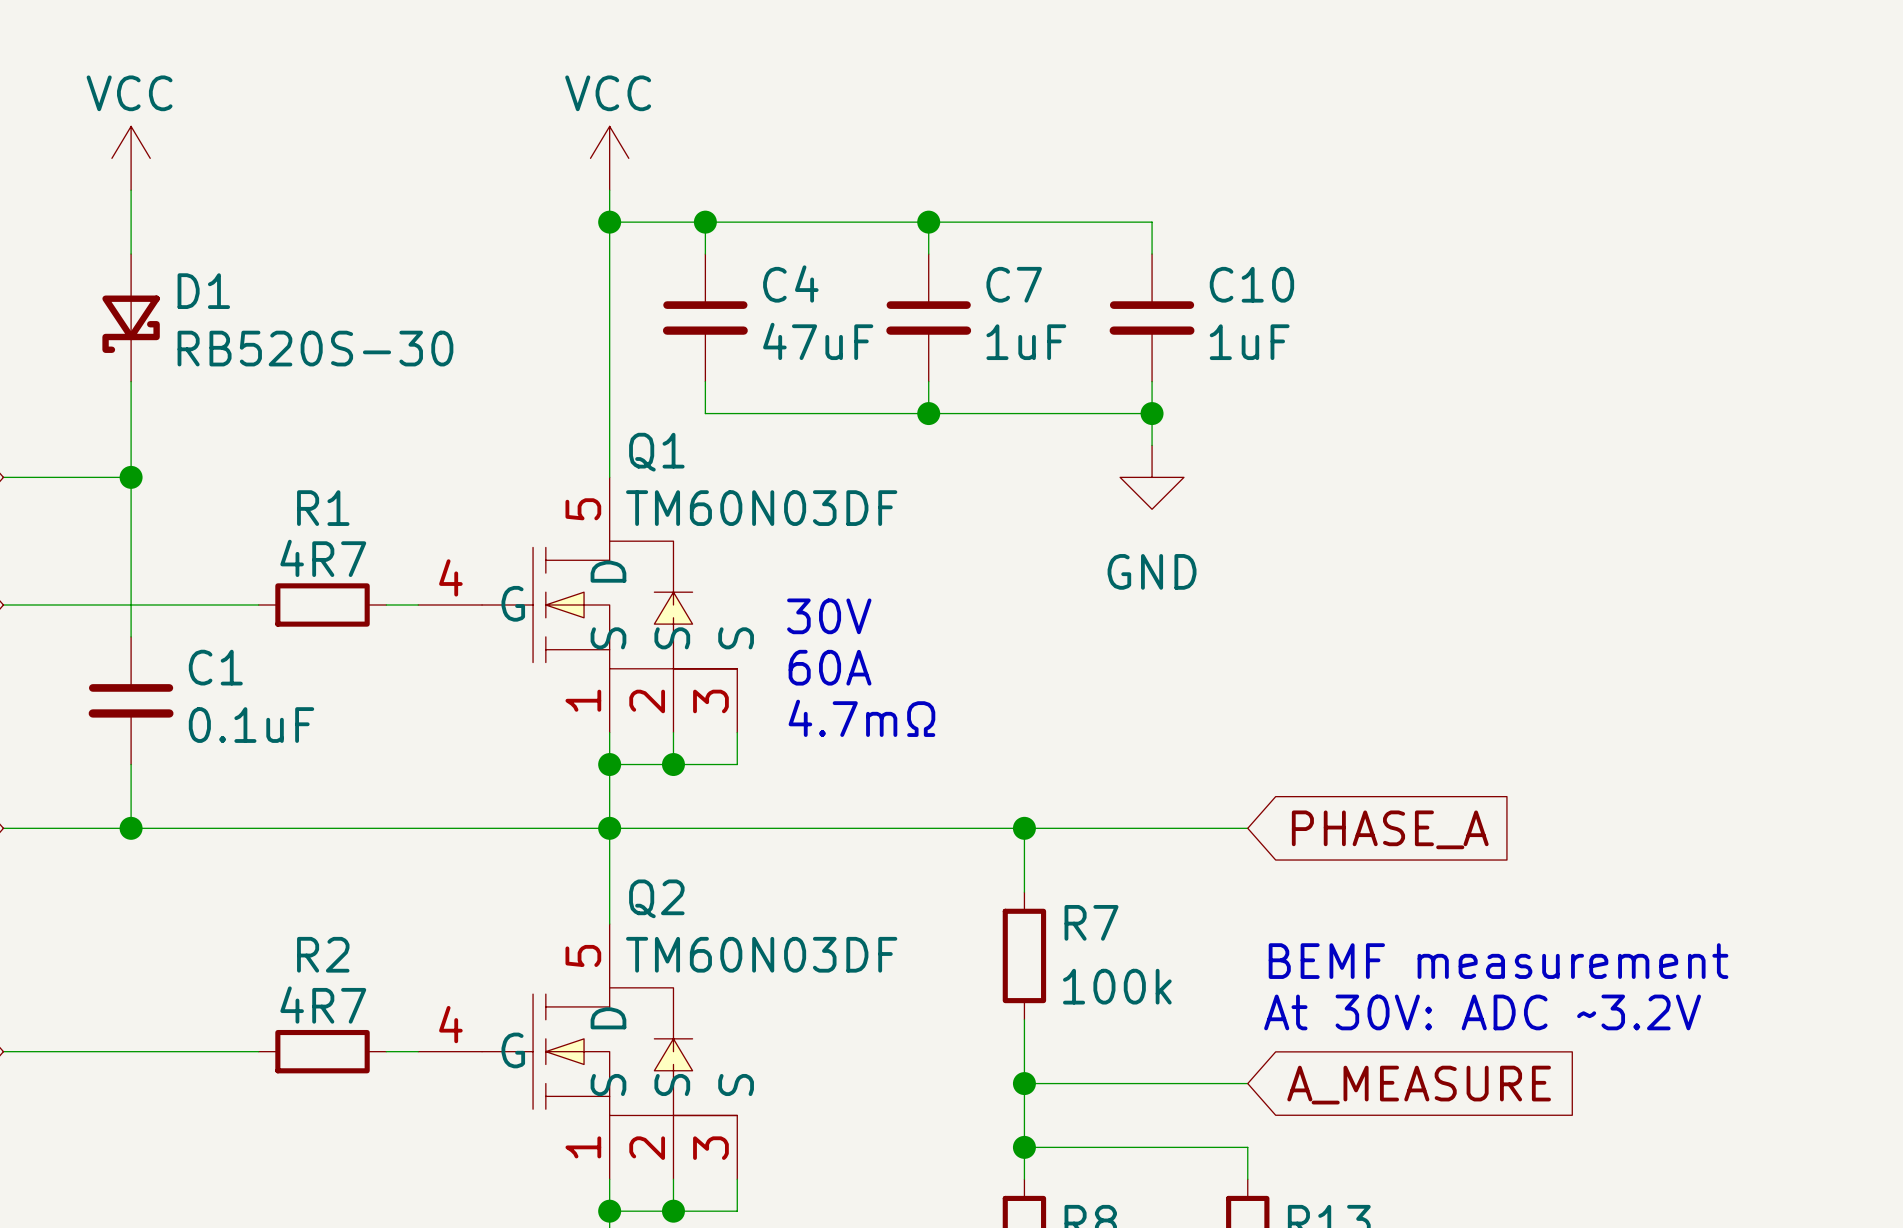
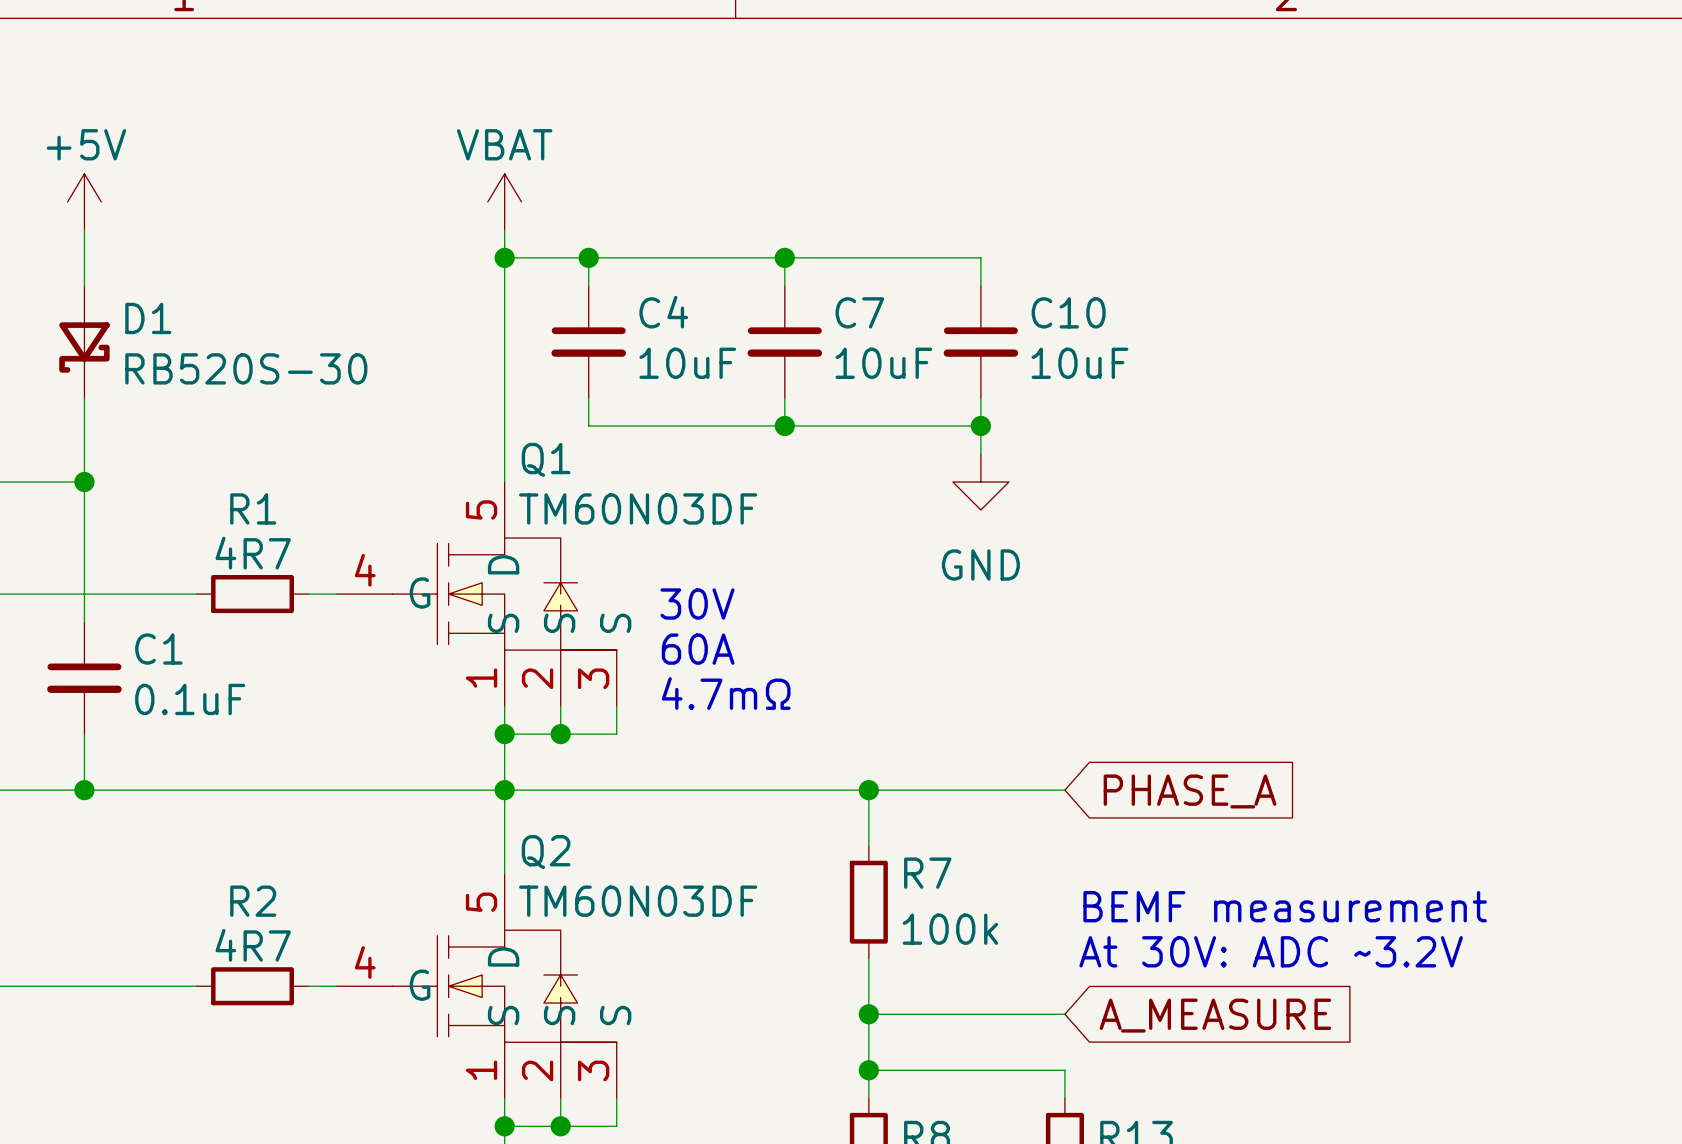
power symbol: VCC (131, 158) -> +5V (84, 201)
power symbol: VCC (609, 158) -> VBAT (504, 201)
C4 value: 47uF (818, 341) -> 10uF (687, 363)
C7 value: 1uF (1026, 342) -> 10uF (883, 363)
C10 value: 1uF (1249, 342) -> 10uF (1079, 363)

